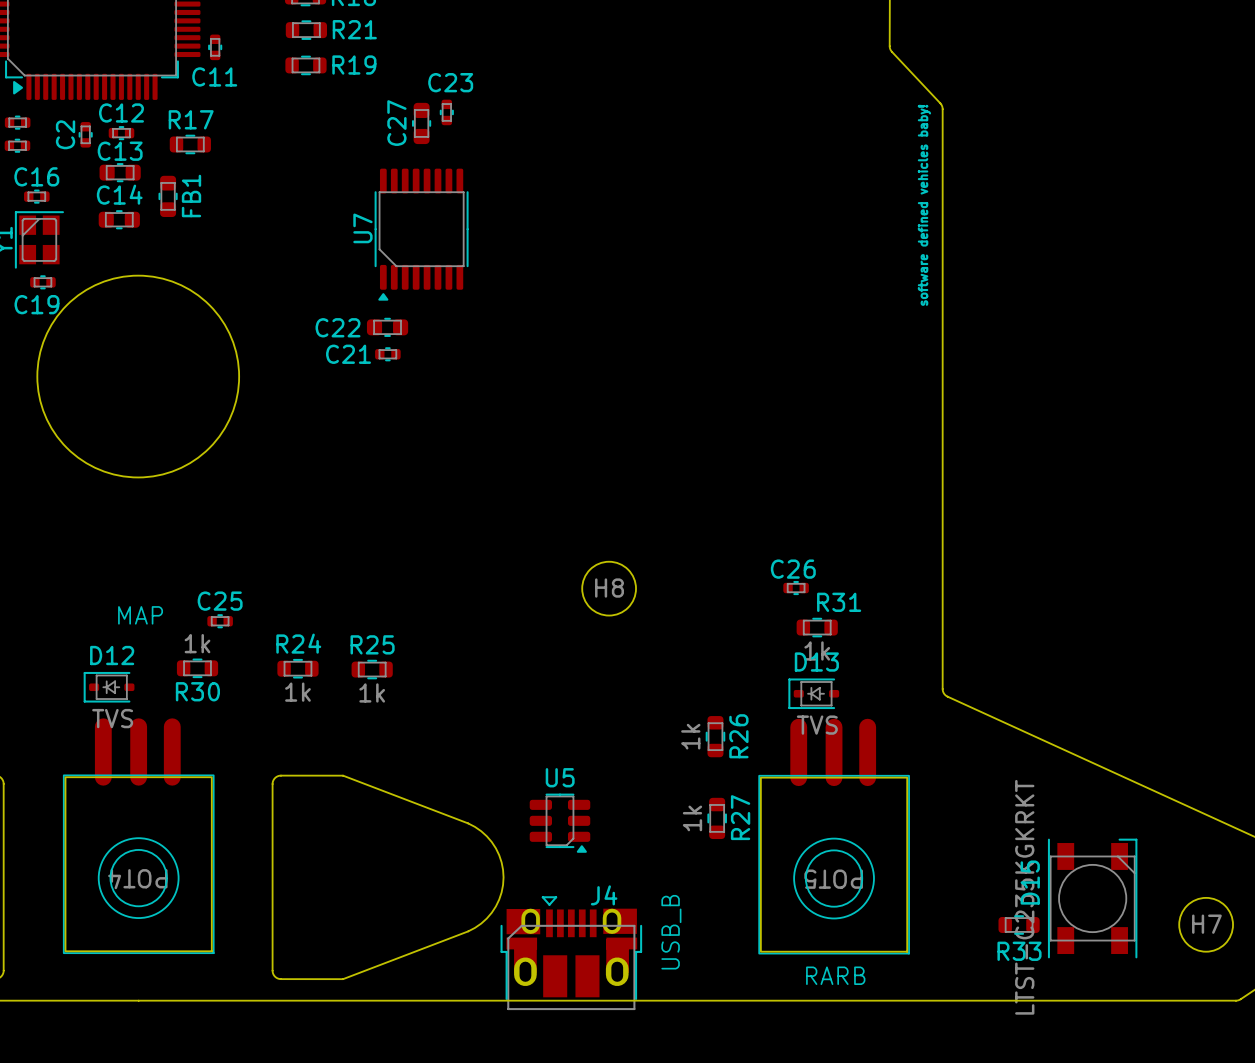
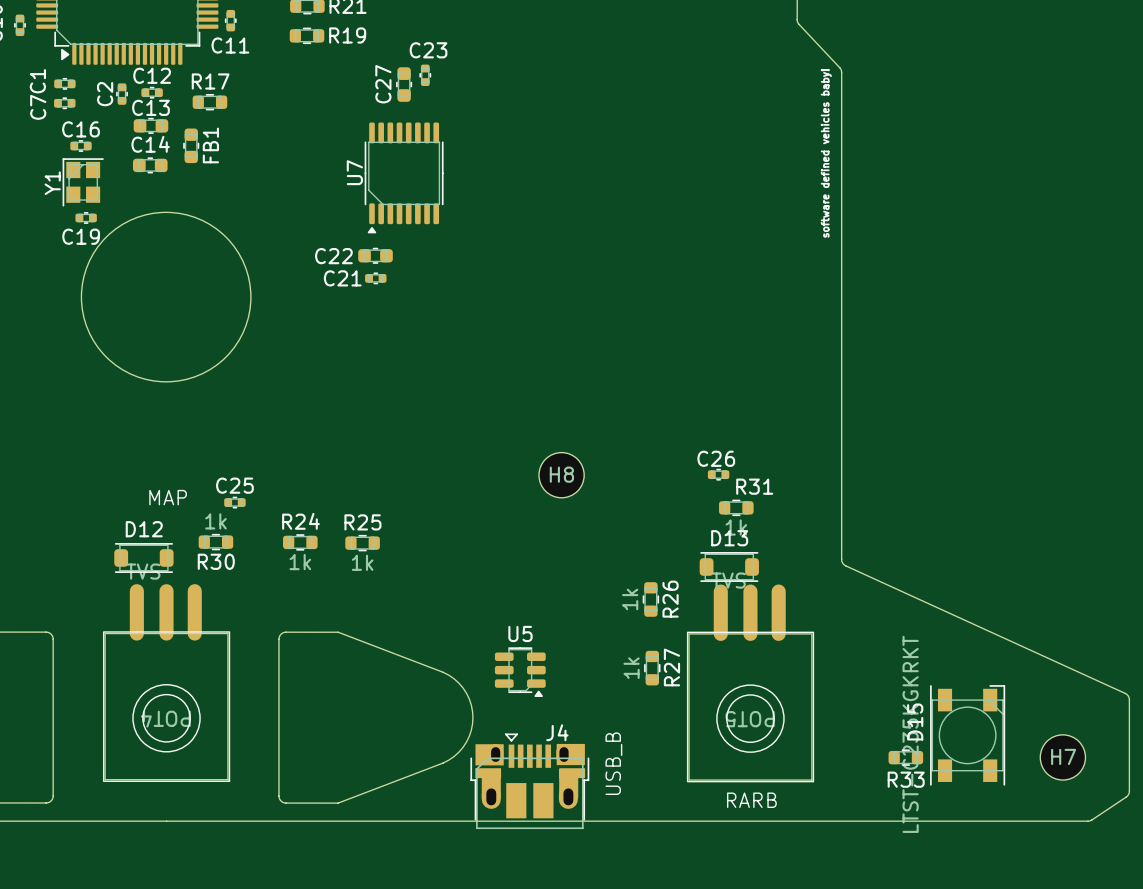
D12 footprint: [83, 671, 135, 703] -> [114, 543, 174, 573]
D13 footprint: [788, 678, 840, 710] -> [699, 552, 759, 582]

